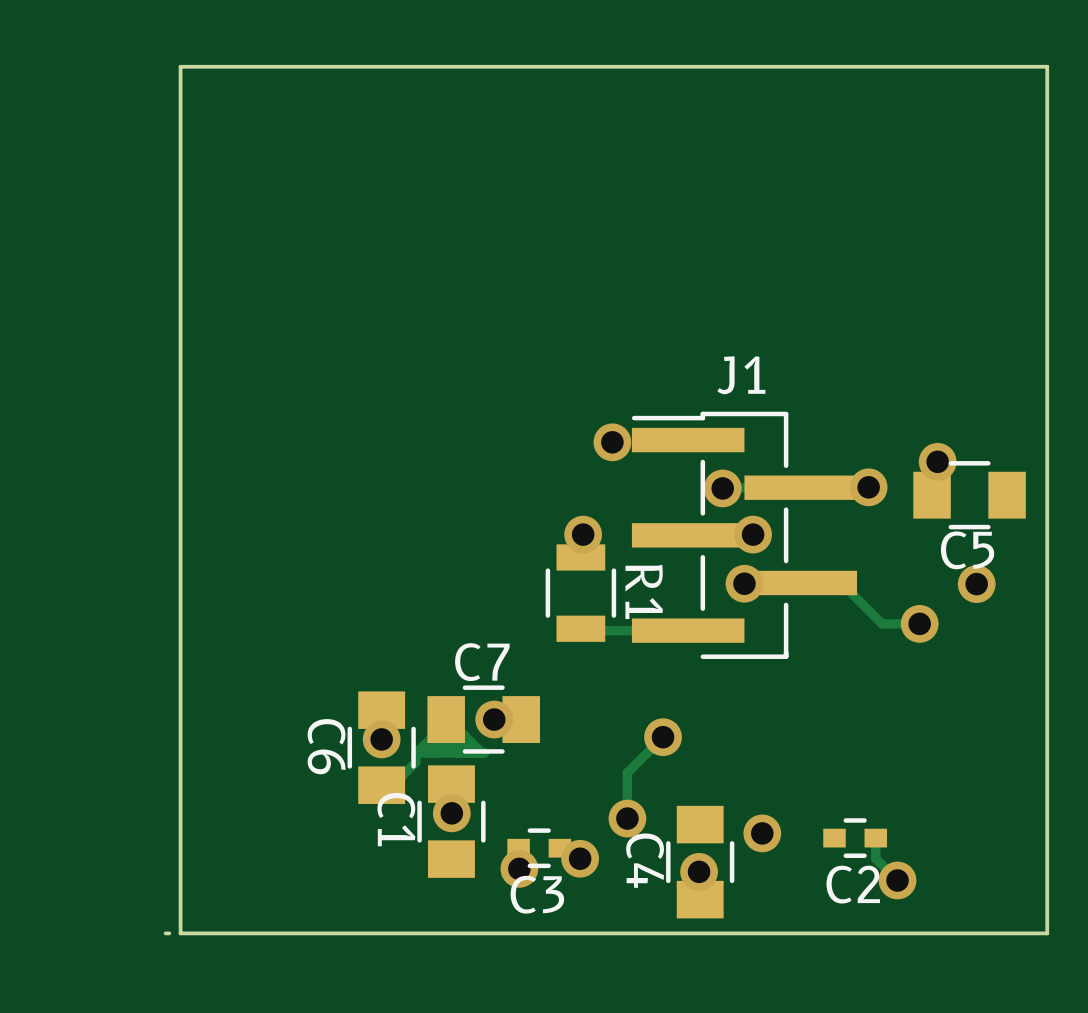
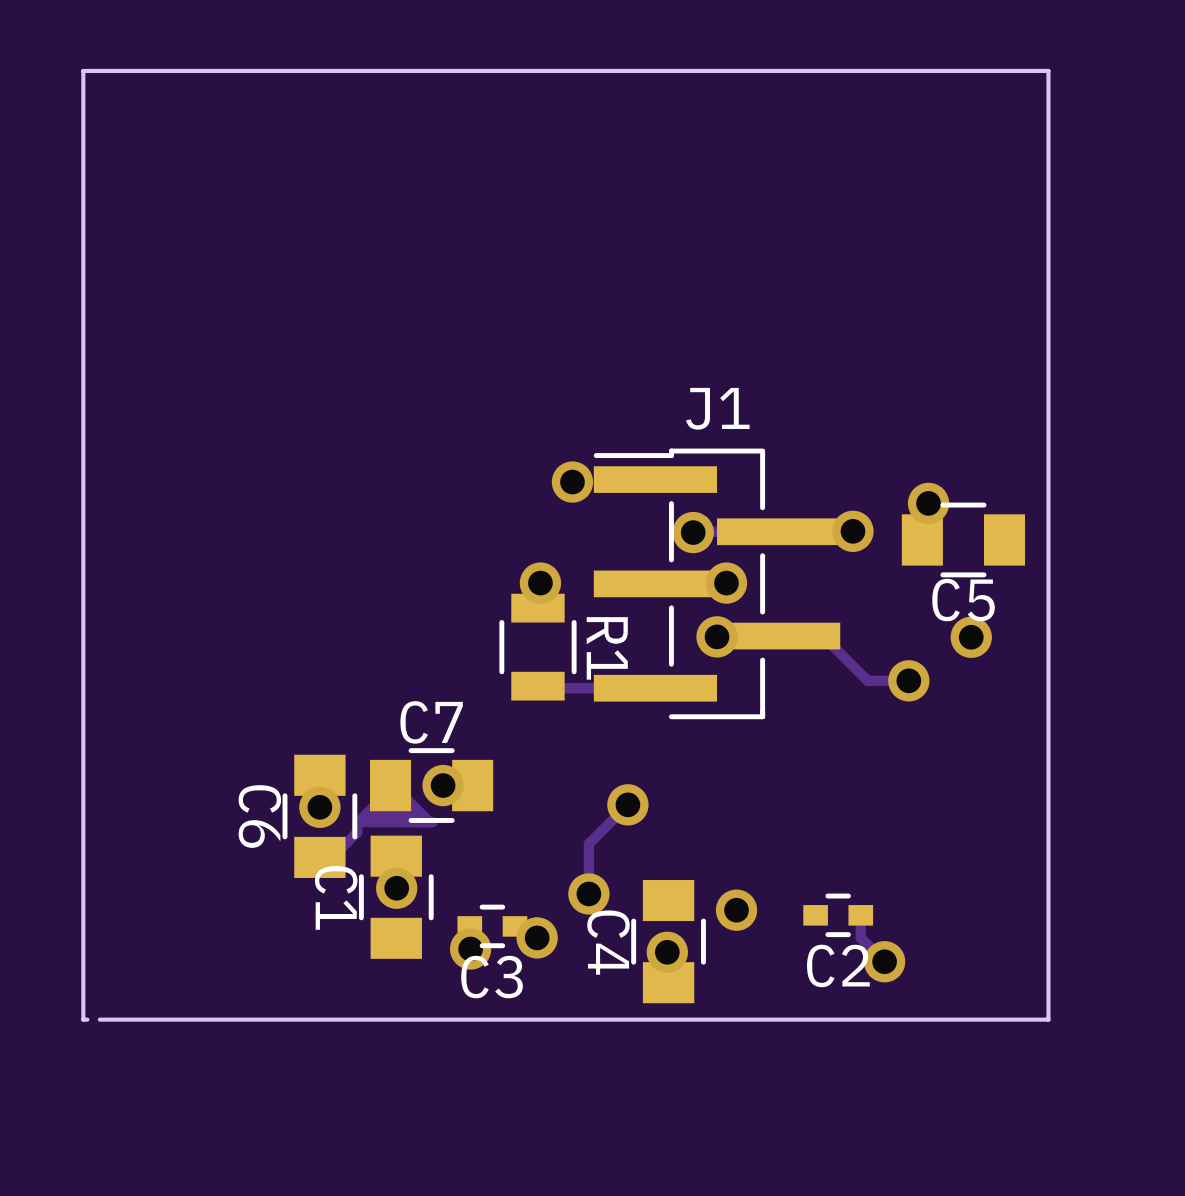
board edge: (180, 66) (180, 933) -> (99, 70) (83, 70) (83, 1019)

